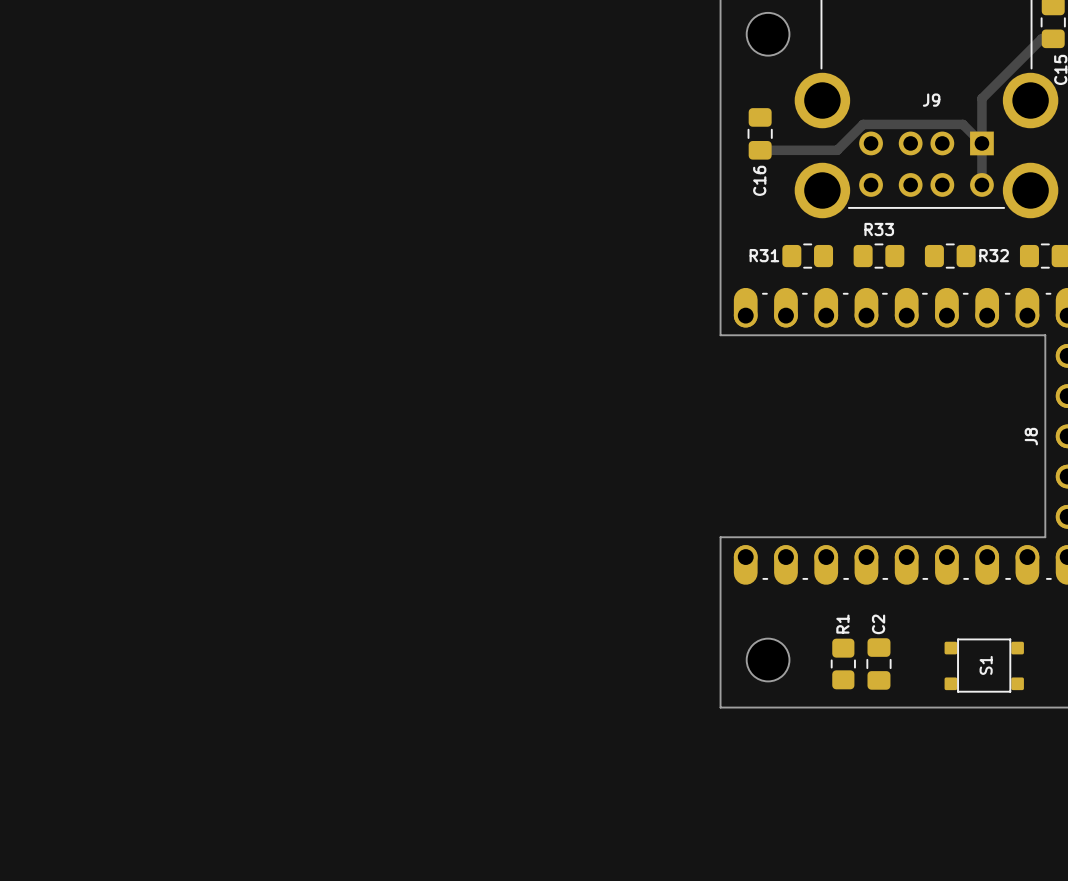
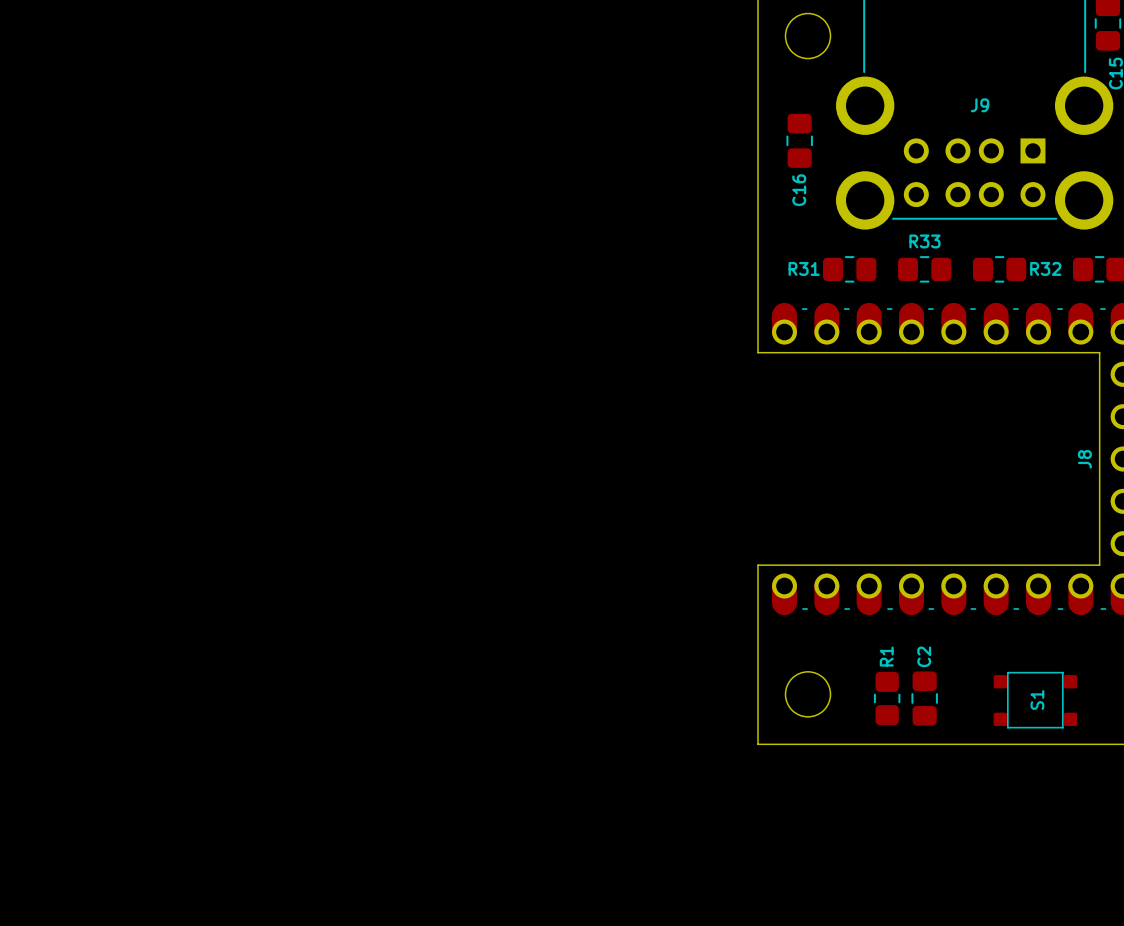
track: (1053, 38) (1041, 38) (981, 98) (981, 184) -> none
track: (981, 143) (962, 124) (863, 124) (837, 150) (760, 150) -> none

